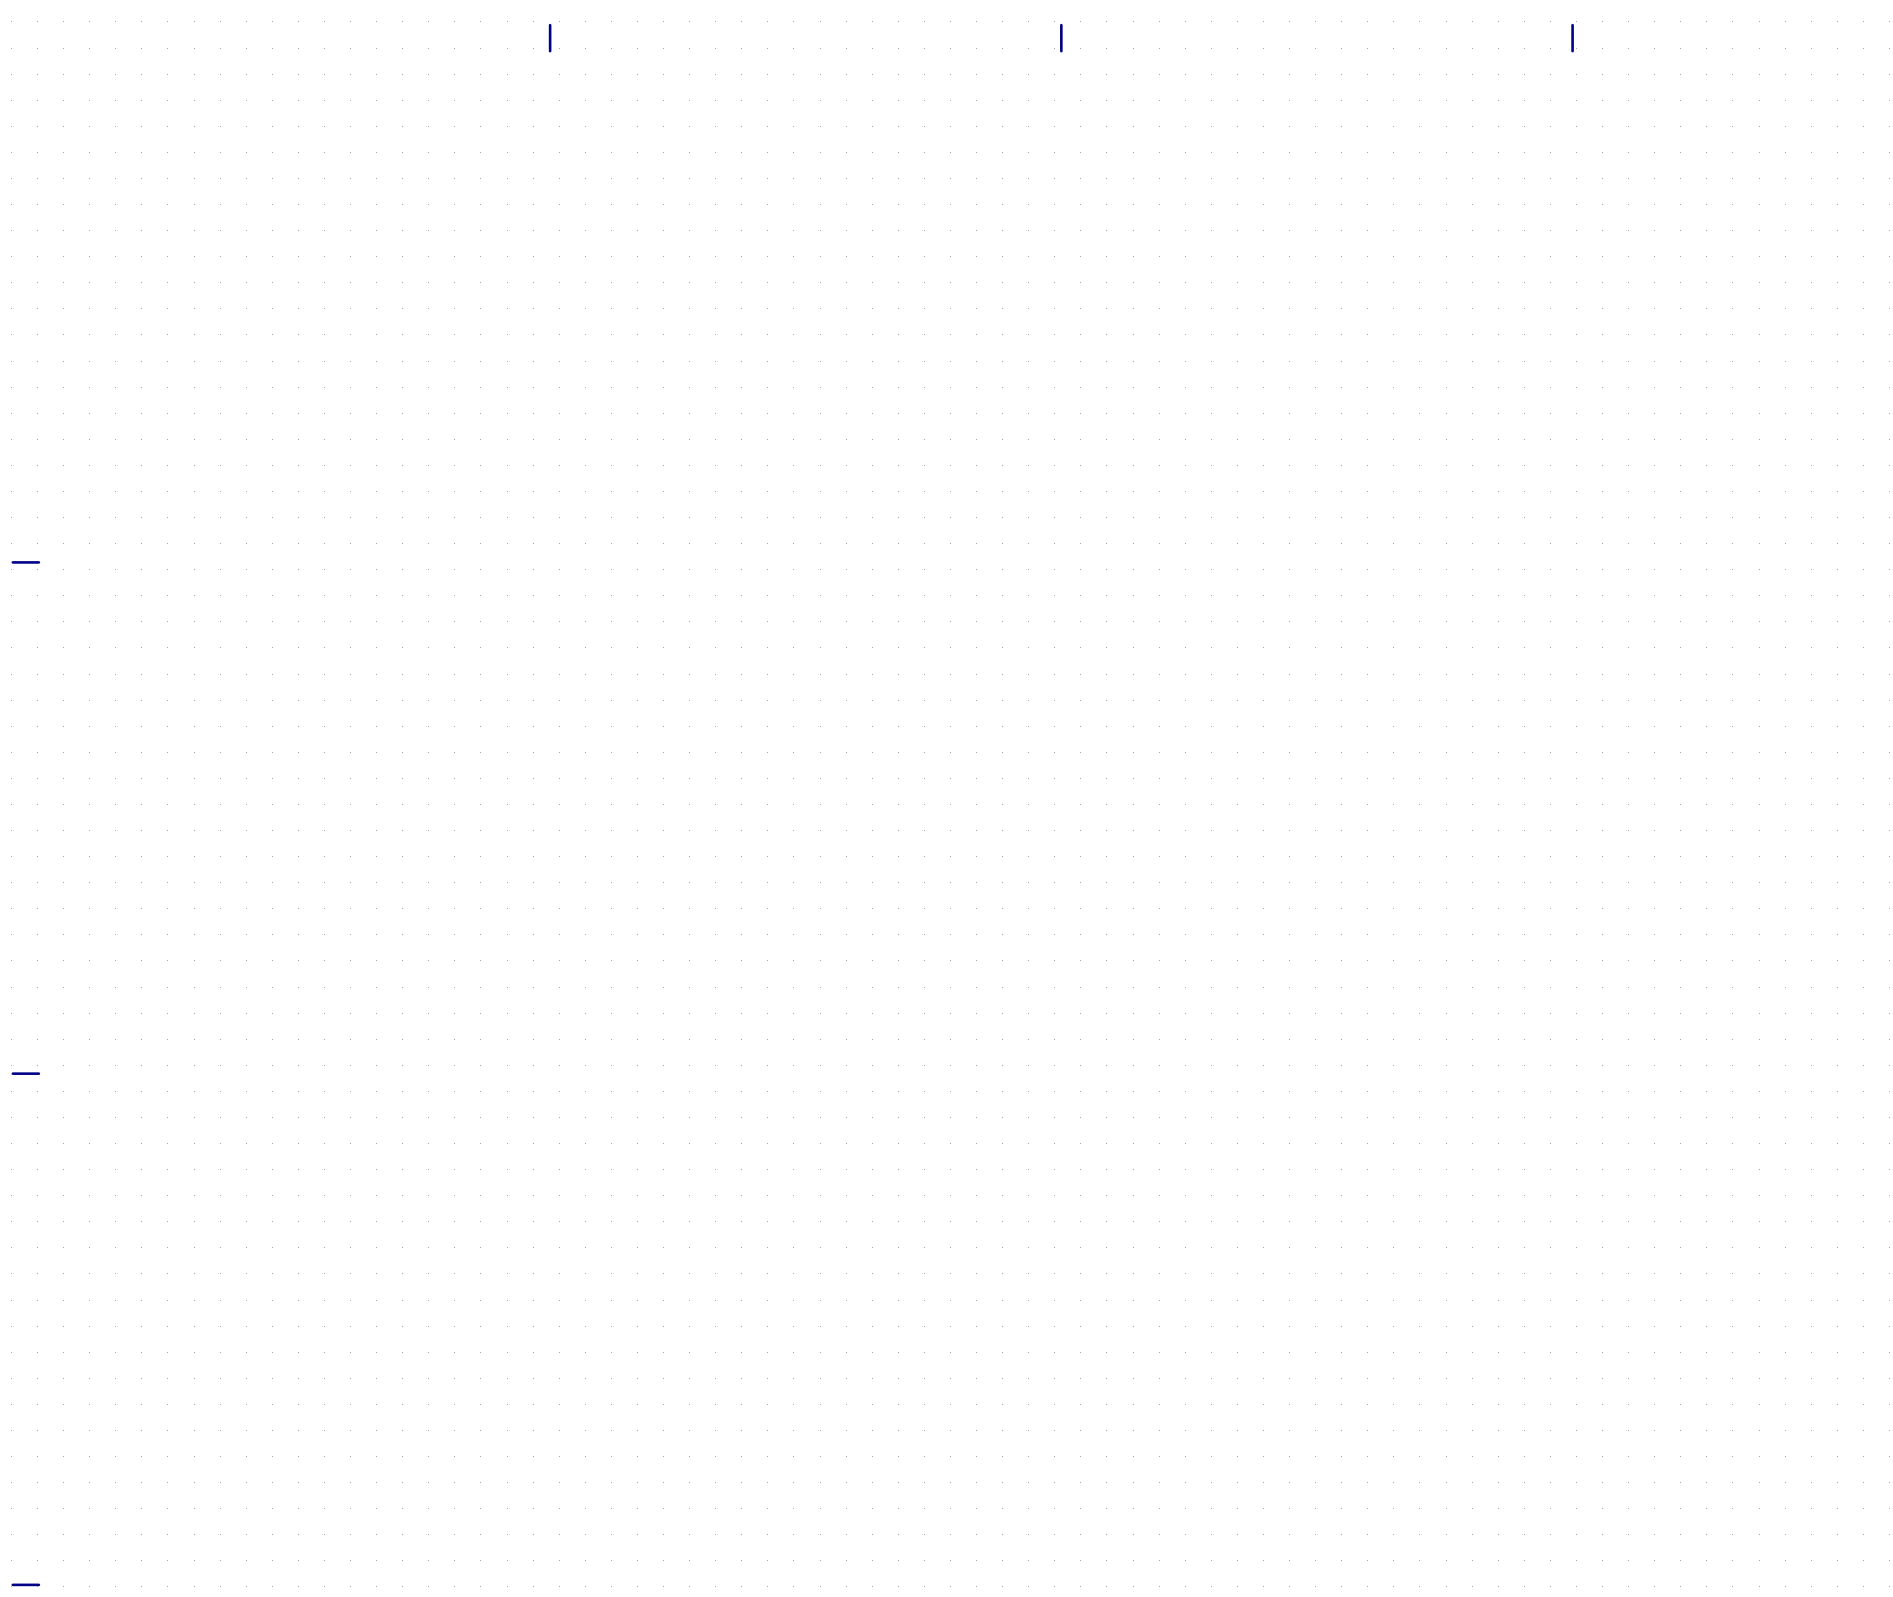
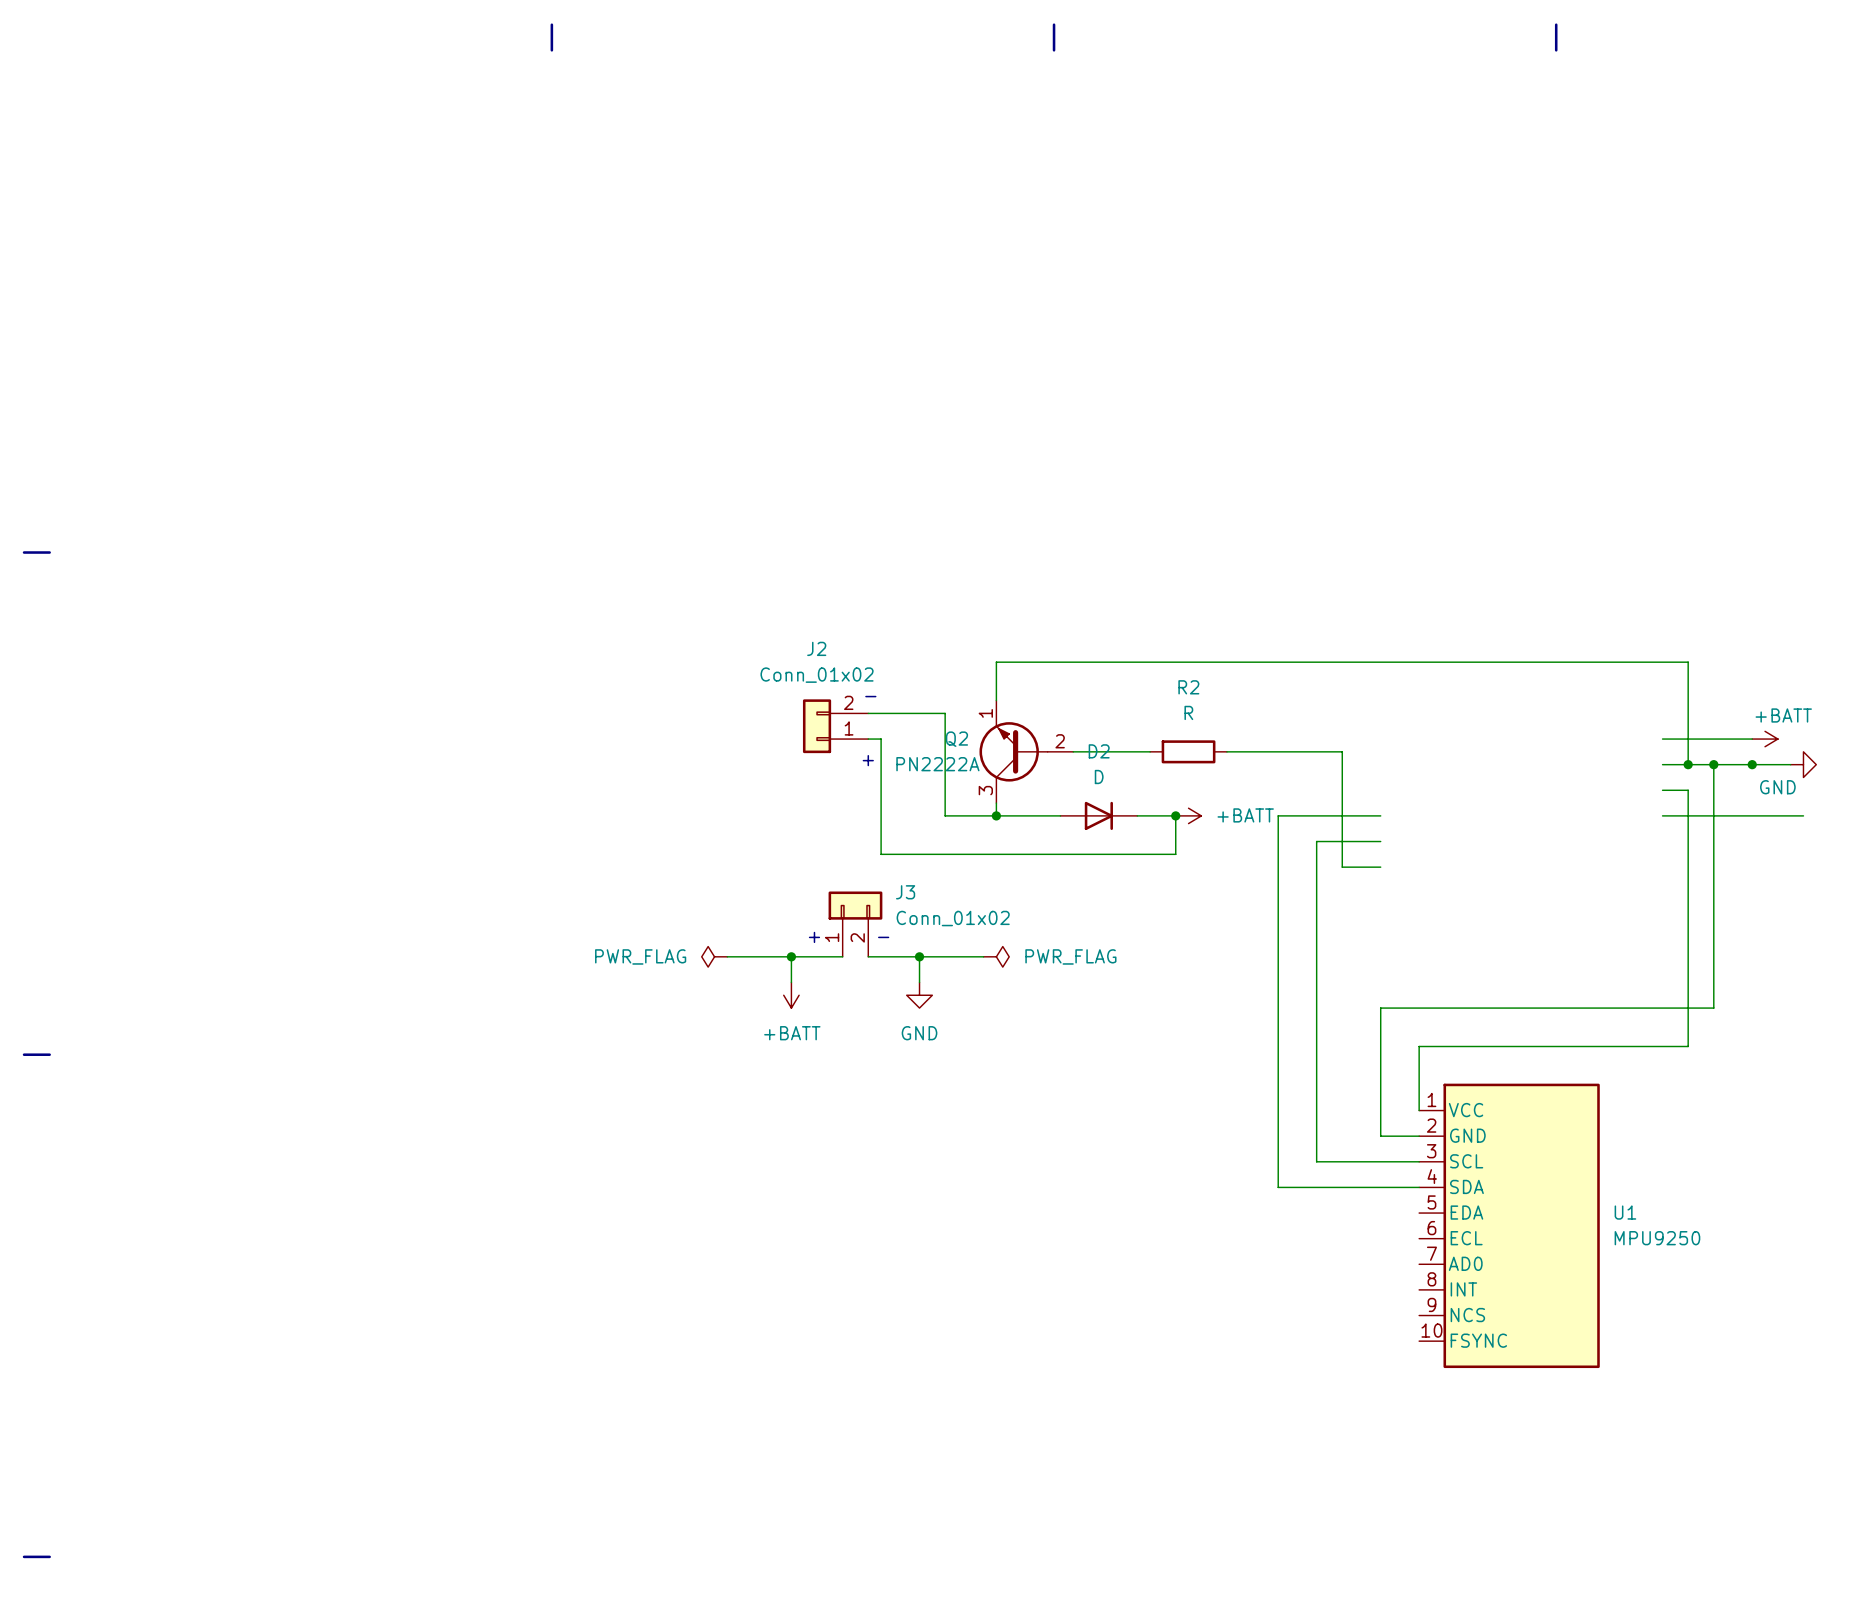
text: none -> - (870, 696)
wire: none -> (996, 700) (996, 662) (1688, 662) (1688, 764)
wire: none -> (868, 713) (945, 713) (945, 815) (1060, 815)
J2: none -> Conn_01x02 (835, 726)
wire: none -> (868, 739) (881, 739) (881, 854) (1175, 854) (1175, 815) (1137, 815)
wire: none -> (1662, 739) (1752, 739)
power symbol: none -> +BATT (1765, 739)
Q2: none -> PN2222A (1026, 751)
wire: none -> (1073, 751) (1150, 751)
R2: none -> R (1188, 751)
wire: none -> (1226, 751) (1342, 751) (1342, 867) (1380, 867)
text: none -> + (868, 760)
wire: none -> (1662, 764) (1790, 764)
junction: none -> (1688, 764)
wire: none -> (1713, 764) (1713, 1008) (1380, 1008) (1380, 1136) (1419, 1136)
junction: none -> (1713, 764)
junction: none -> (1752, 764)
power symbol: none -> GND (1803, 764)
wire: none -> (1662, 790) (1688, 790) (1688, 1046) (1419, 1046) (1419, 1110)
wire: none -> (996, 803) (996, 815)
junction: none -> (996, 815)
D2: none -> D (1098, 815)
junction: none -> (1175, 815)
power symbol: none -> +BATT (1188, 815)
wire: none -> (1380, 815) (1278, 815) (1278, 1187) (1419, 1187)
wire: none -> (1662, 815) (1803, 815)
wire: none -> (1380, 841) (1316, 841) (1316, 1161) (1419, 1161)
J3: none -> Conn_01x02 (855, 924)
text: none -> + (814, 937)
text: none -> - (883, 937)
power symbol: none -> PWR_FLAG (714, 956)
wire: none -> (727, 956) (842, 956)
wire: none -> (791, 956) (791, 982)
junction: none -> (791, 956)
wire: none -> (868, 956) (983, 956)
wire: none -> (919, 956) (919, 982)
junction: none -> (919, 956)
power symbol: none -> PWR_FLAG (996, 956)
power symbol: none -> +BATT (791, 995)
power symbol: none -> GND (919, 995)
U1: none -> MPU9250 (1509, 1225)

